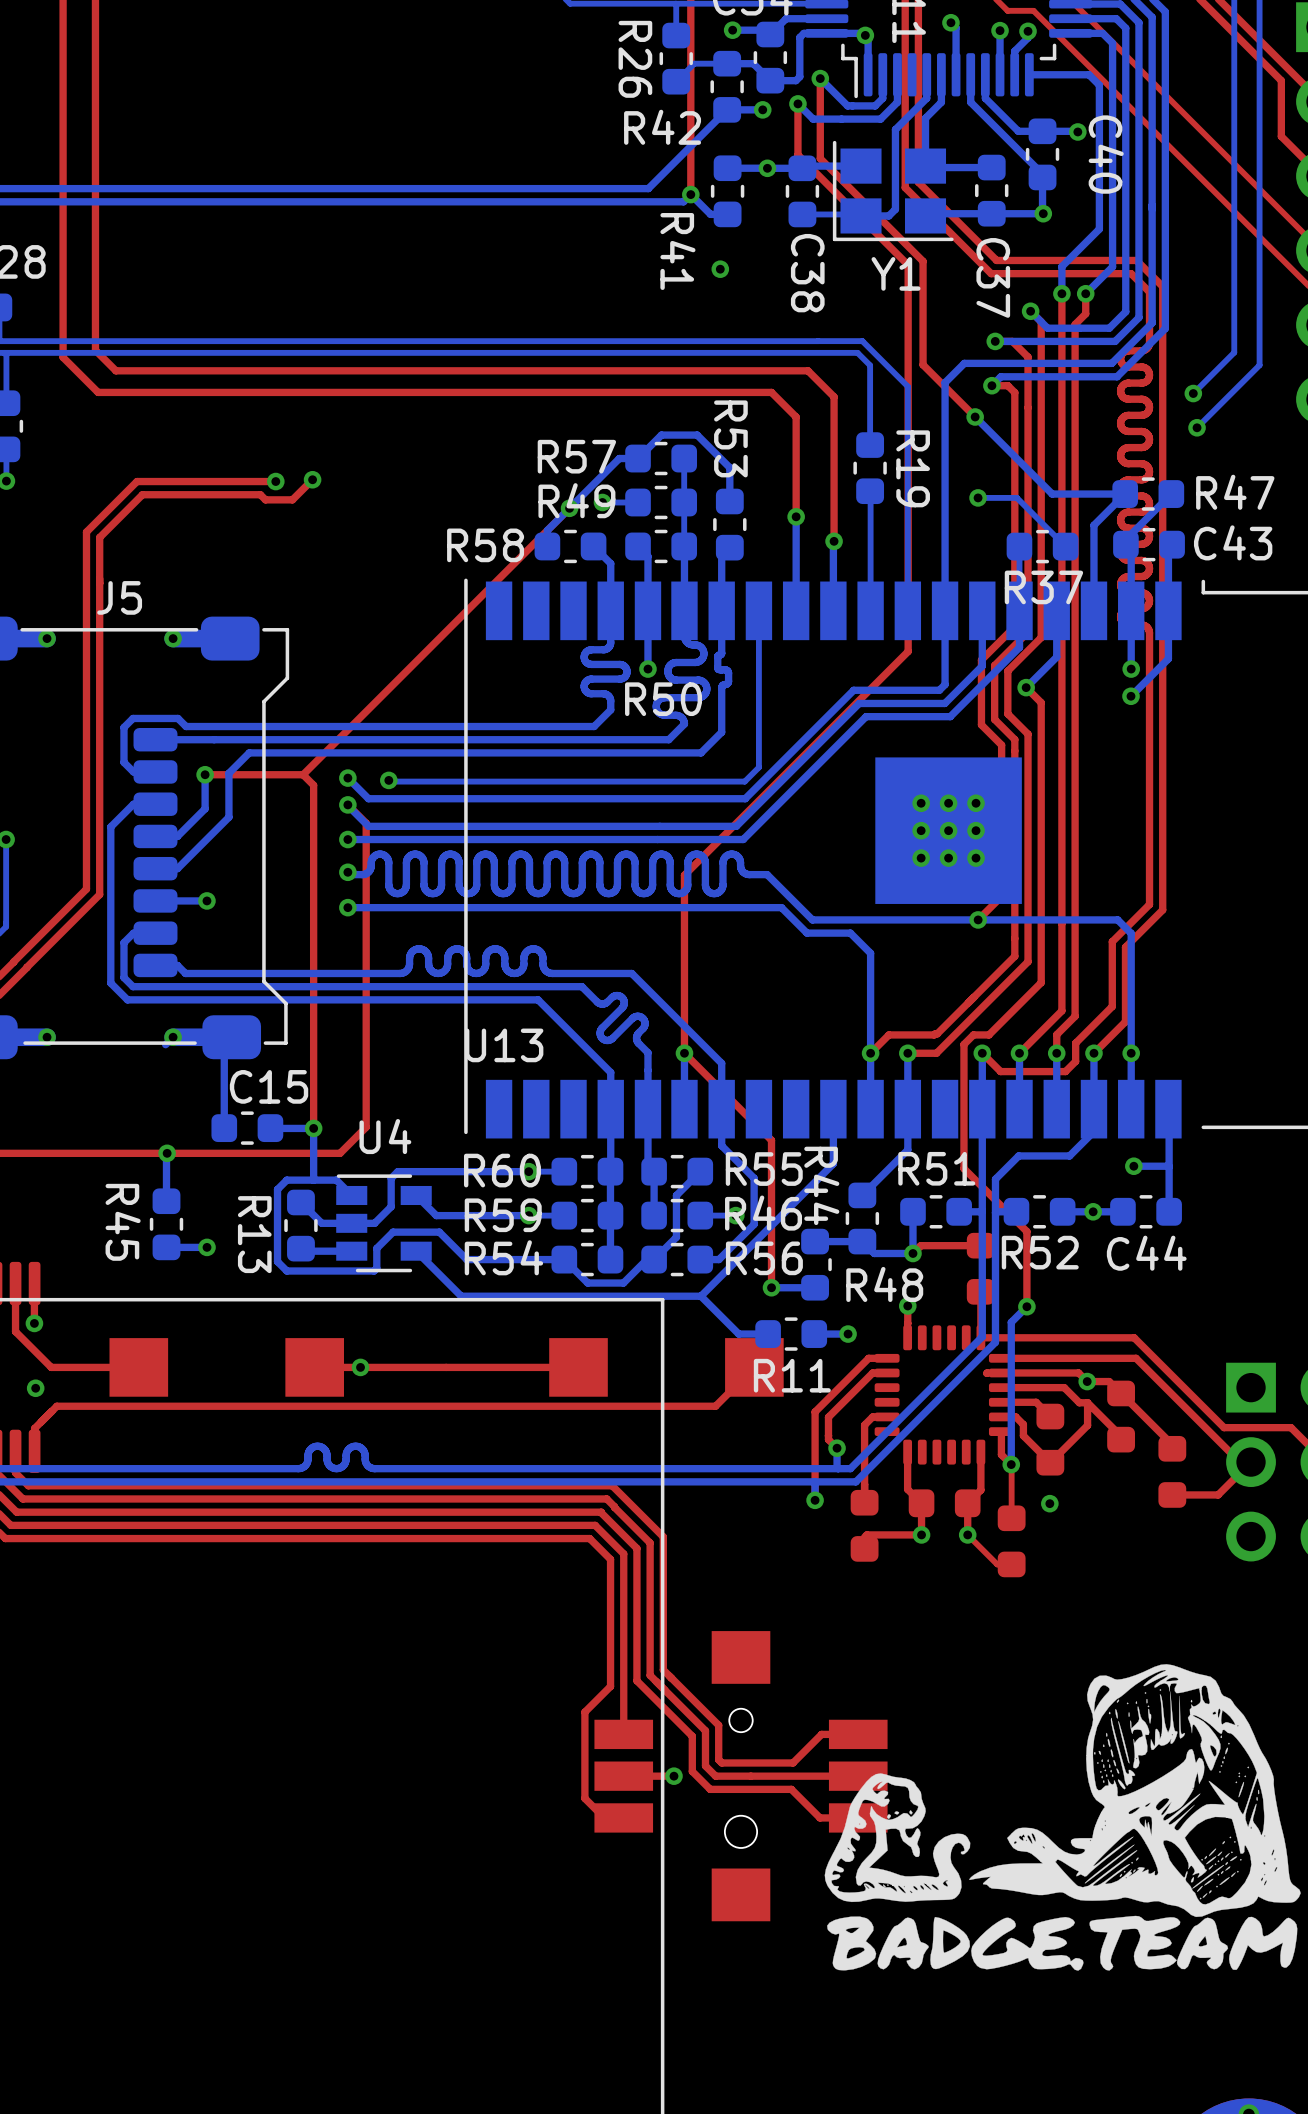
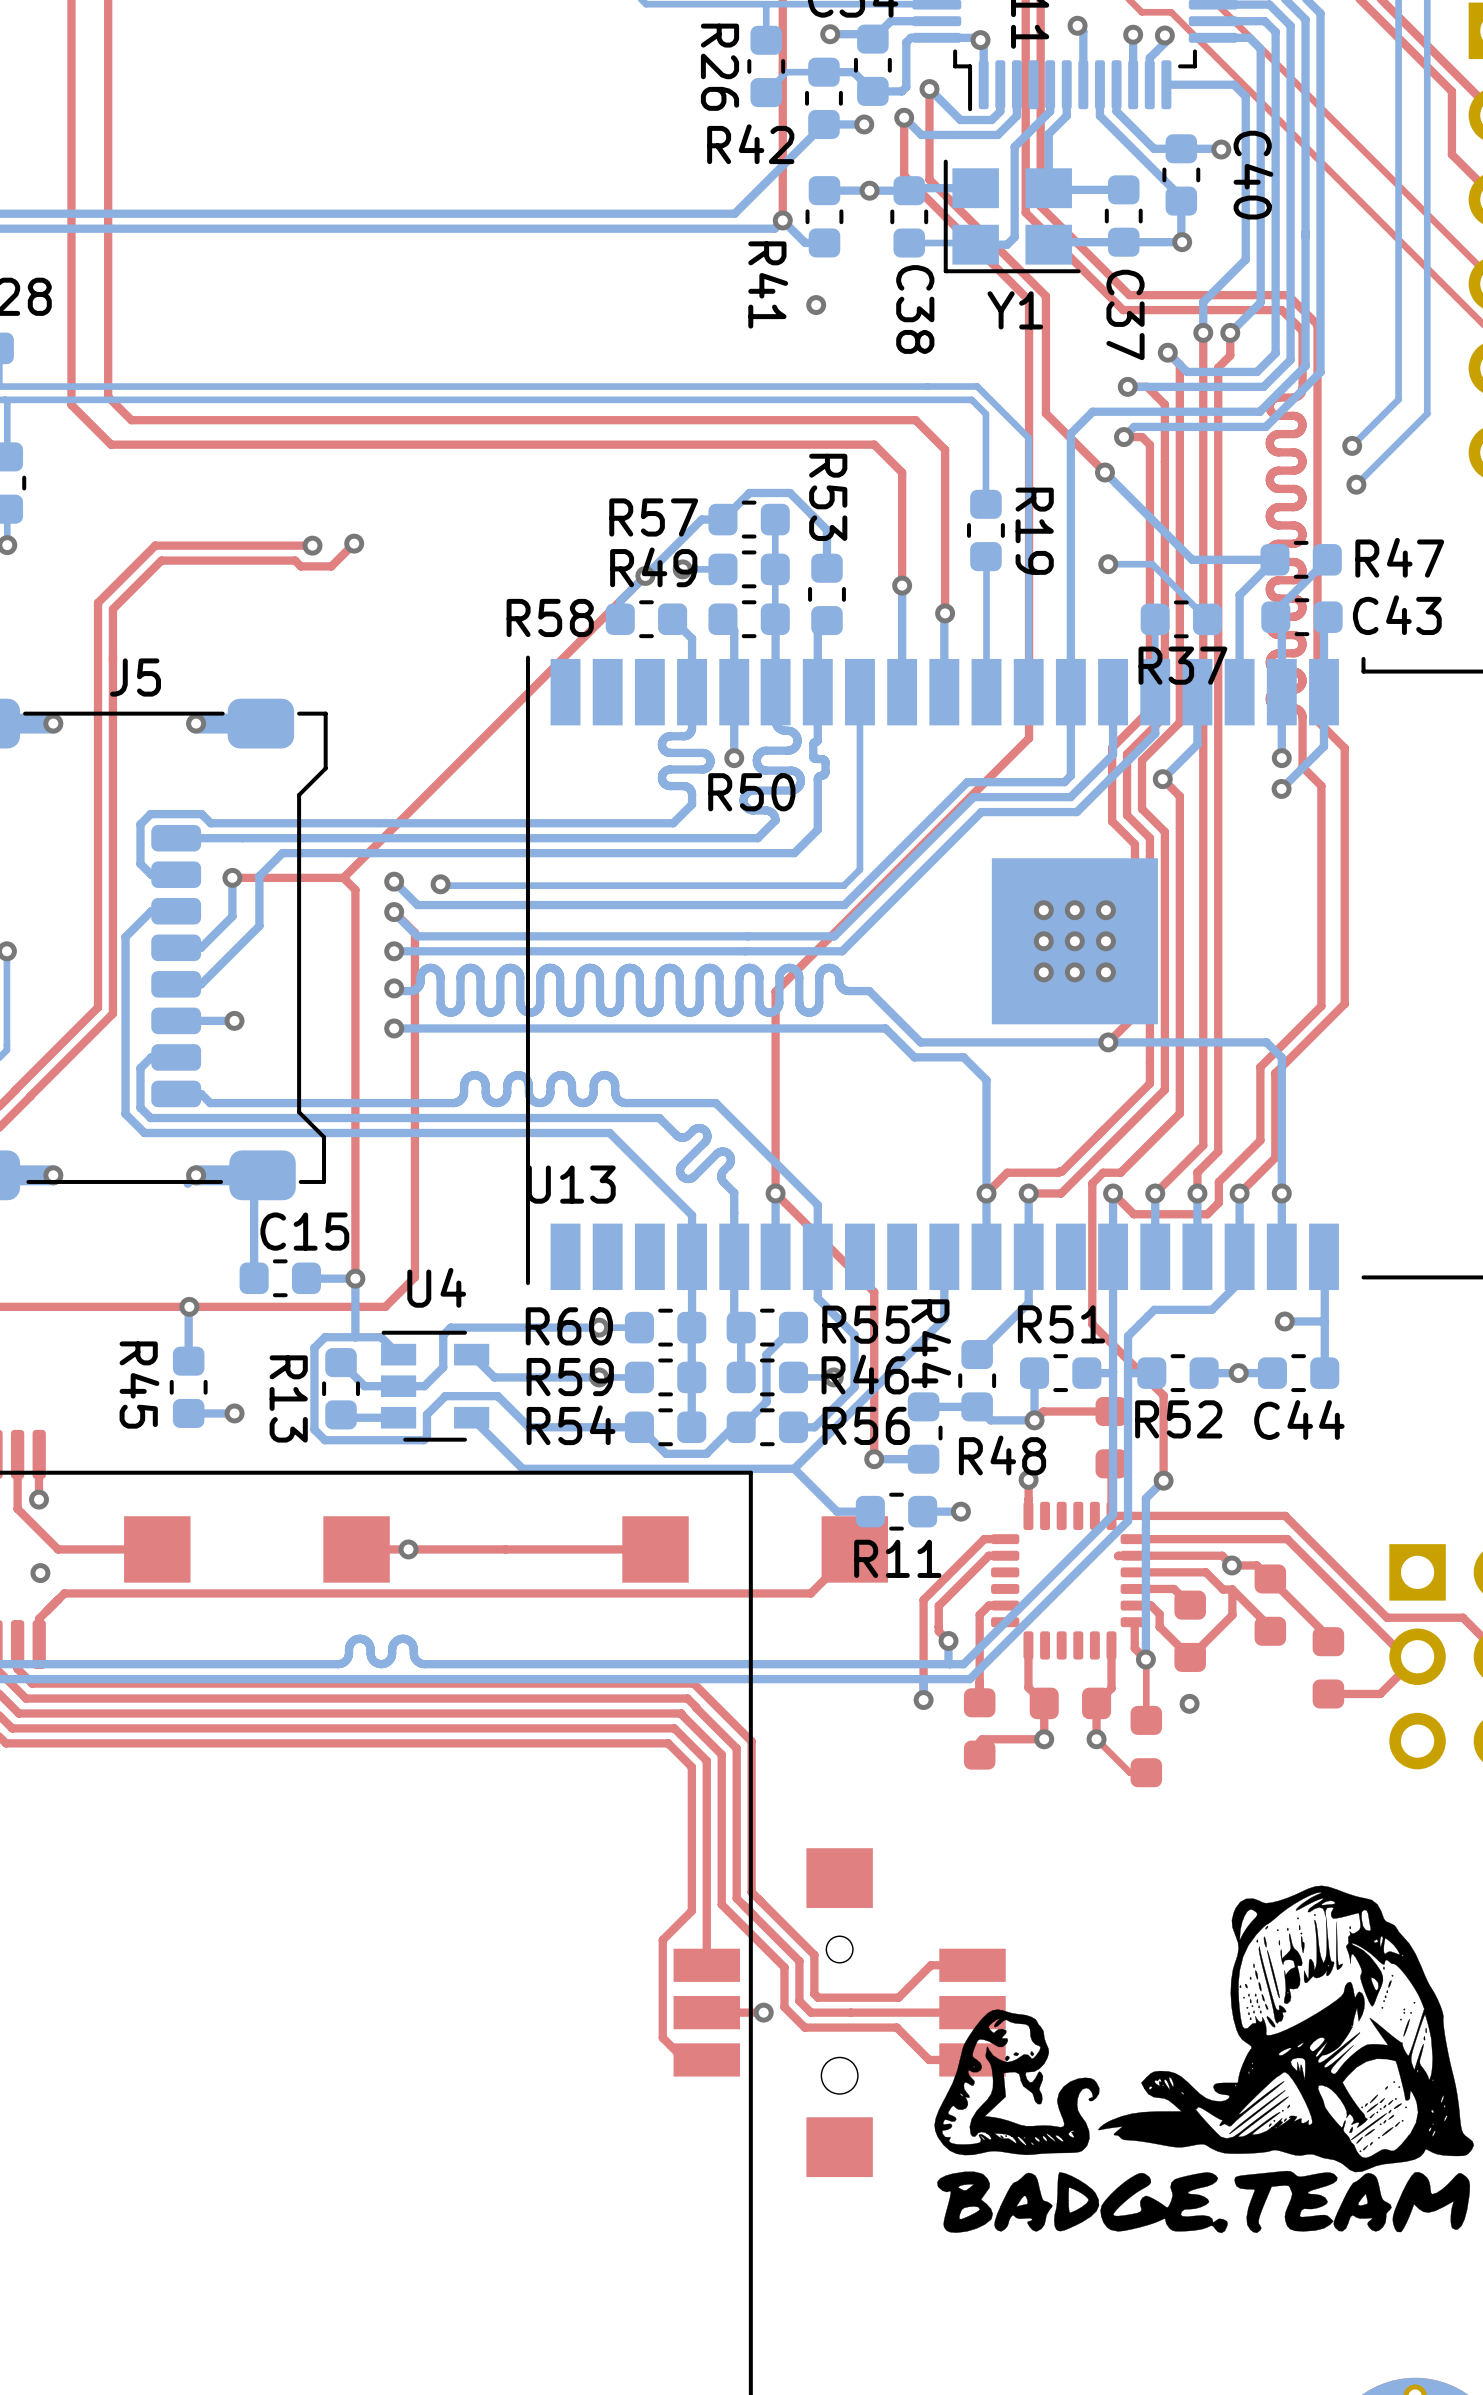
top track: (1162, 636) (1162, 909) -> (1317, 720) (1344, 748) (1344, 1003) (1317, 1031)
top track: (1149, 676) (1149, 904) -> (1302, 767) (1321, 785) (1321, 1006) (1302, 1024)

